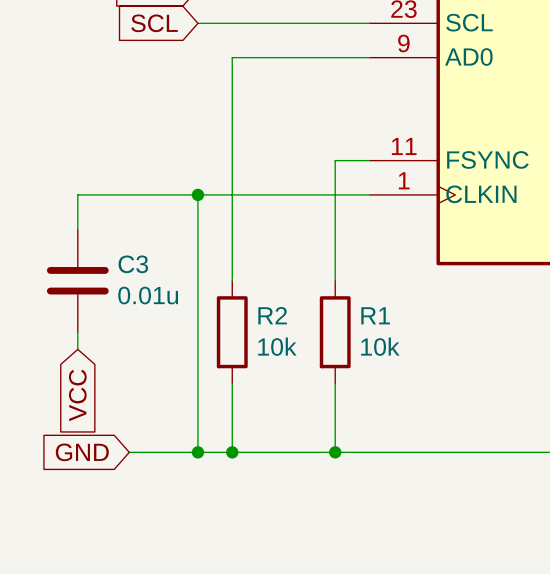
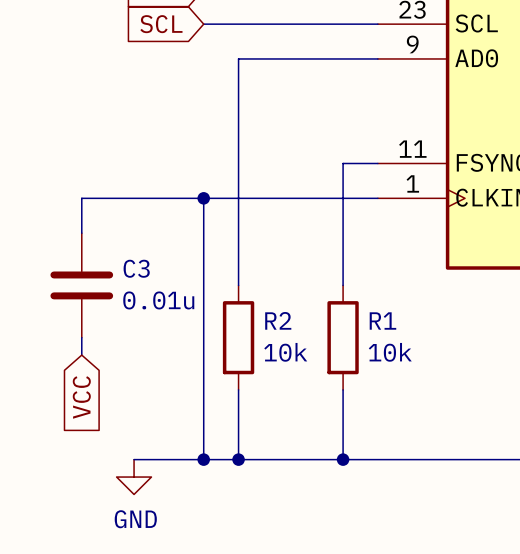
global label: GND (82, 452) -> none
power symbol: none -> GND (134, 477)

